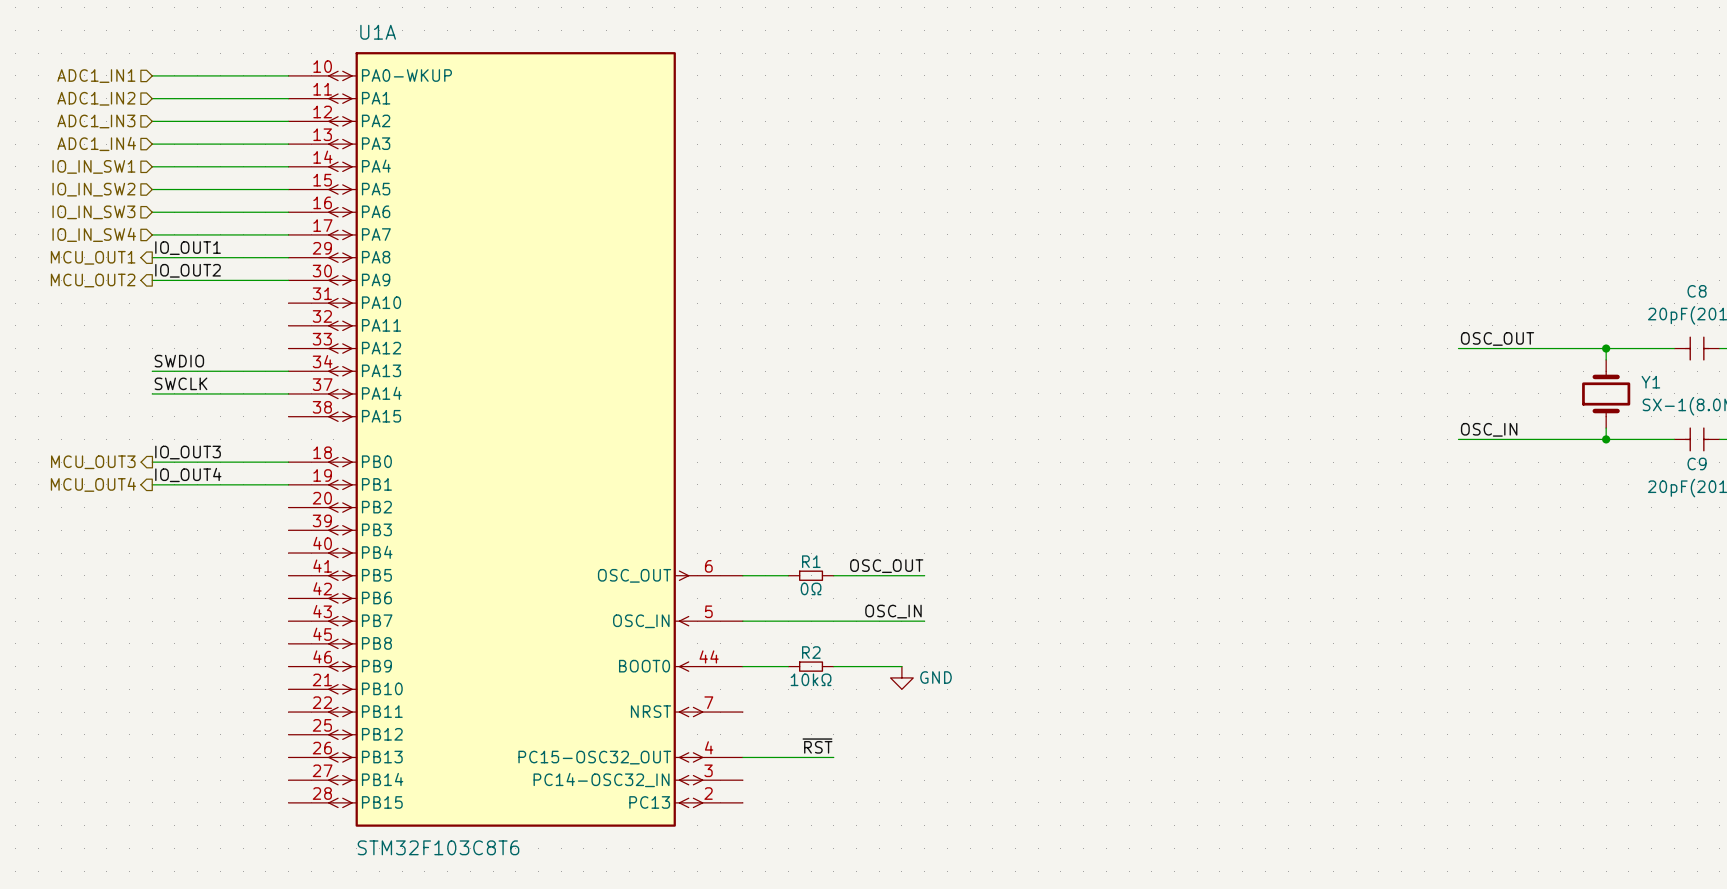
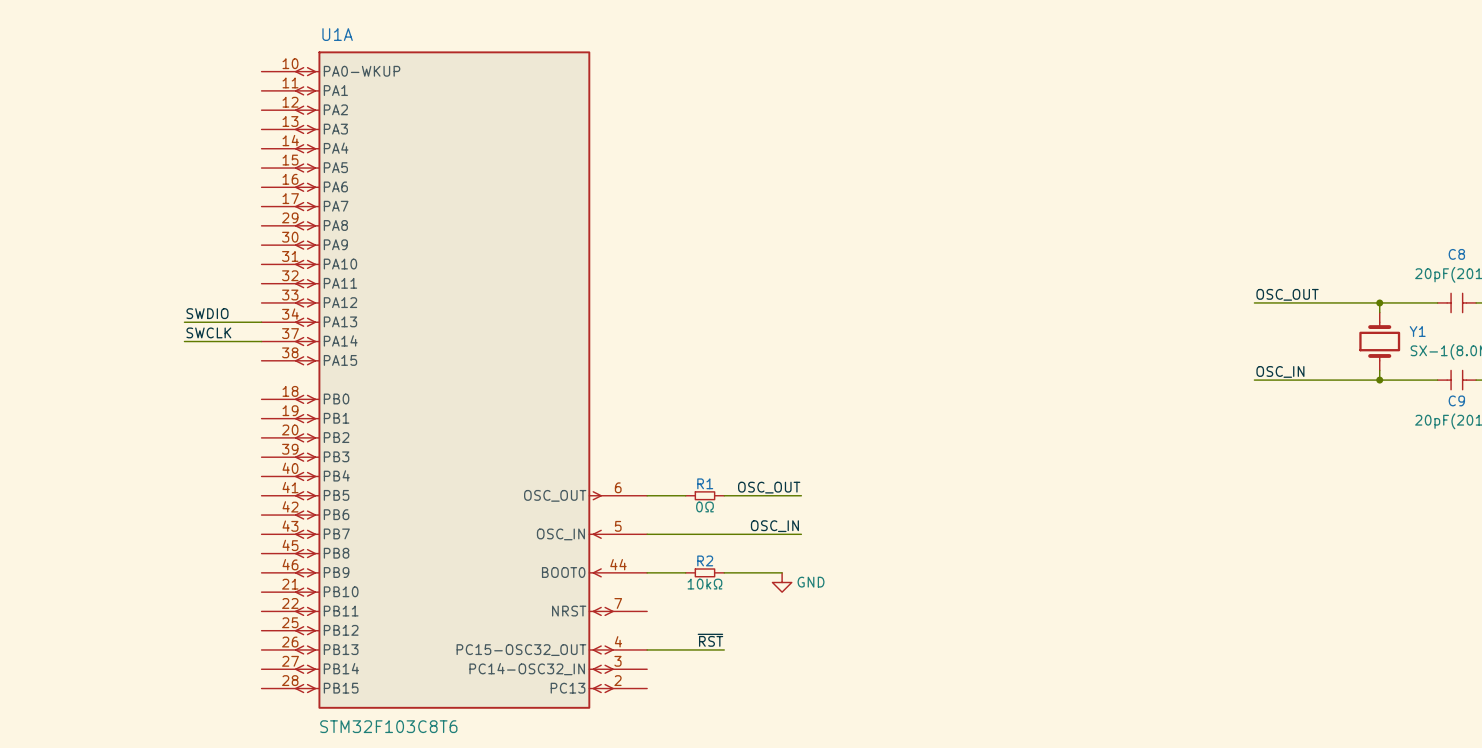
wire: (152, 75) (288, 75) -> none
hierarchical label: ADC1_IN1 (96, 76) -> none
hierarchical label: ADC1_IN2 (96, 98) -> none
wire: (152, 98) (288, 98) -> none
hierarchical label: ADC1_IN3 (96, 121) -> none
wire: (152, 121) (288, 121) -> none
hierarchical label: ADC1_IN4 (96, 143) -> none
wire: (152, 144) (288, 144) -> none
hierarchical label: IO_IN_SW1 (93, 166) -> none
wire: (152, 166) (288, 166) -> none
hierarchical label: IO_IN_SW2 (93, 189) -> none
wire: (152, 189) (288, 189) -> none
hierarchical label: IO_IN_SW3 (93, 212) -> none
wire: (152, 212) (288, 212) -> none
hierarchical label: IO_IN_SW4 (94, 234) -> none
wire: (152, 234) (288, 234) -> none
label: IO_OUT1 (188, 248) -> none
hierarchical label: MCU_OUT1 (93, 257) -> none
wire: (152, 257) (288, 257) -> none
label: IO_OUT2 (188, 270) -> none
hierarchical label: MCU_OUT2 (93, 280) -> none
wire: (152, 280) (288, 280) -> none
label position: SWDIO (179, 361) -> SWDIO (207, 313)
wire: (152, 371) (197, 371) -> none
label position: SWCLK (181, 383) -> SWCLK (208, 332)
wire: (152, 393) (197, 393) -> none
label: IO_OUT3 (188, 452) -> none
hierarchical label: MCU_OUT3 (93, 462) -> none
wire: (152, 462) (288, 462) -> none
label: IO_OUT4 (188, 474) -> none
hierarchical label: MCU_OUT4 (93, 484) -> none
wire: (152, 484) (288, 484) -> none

